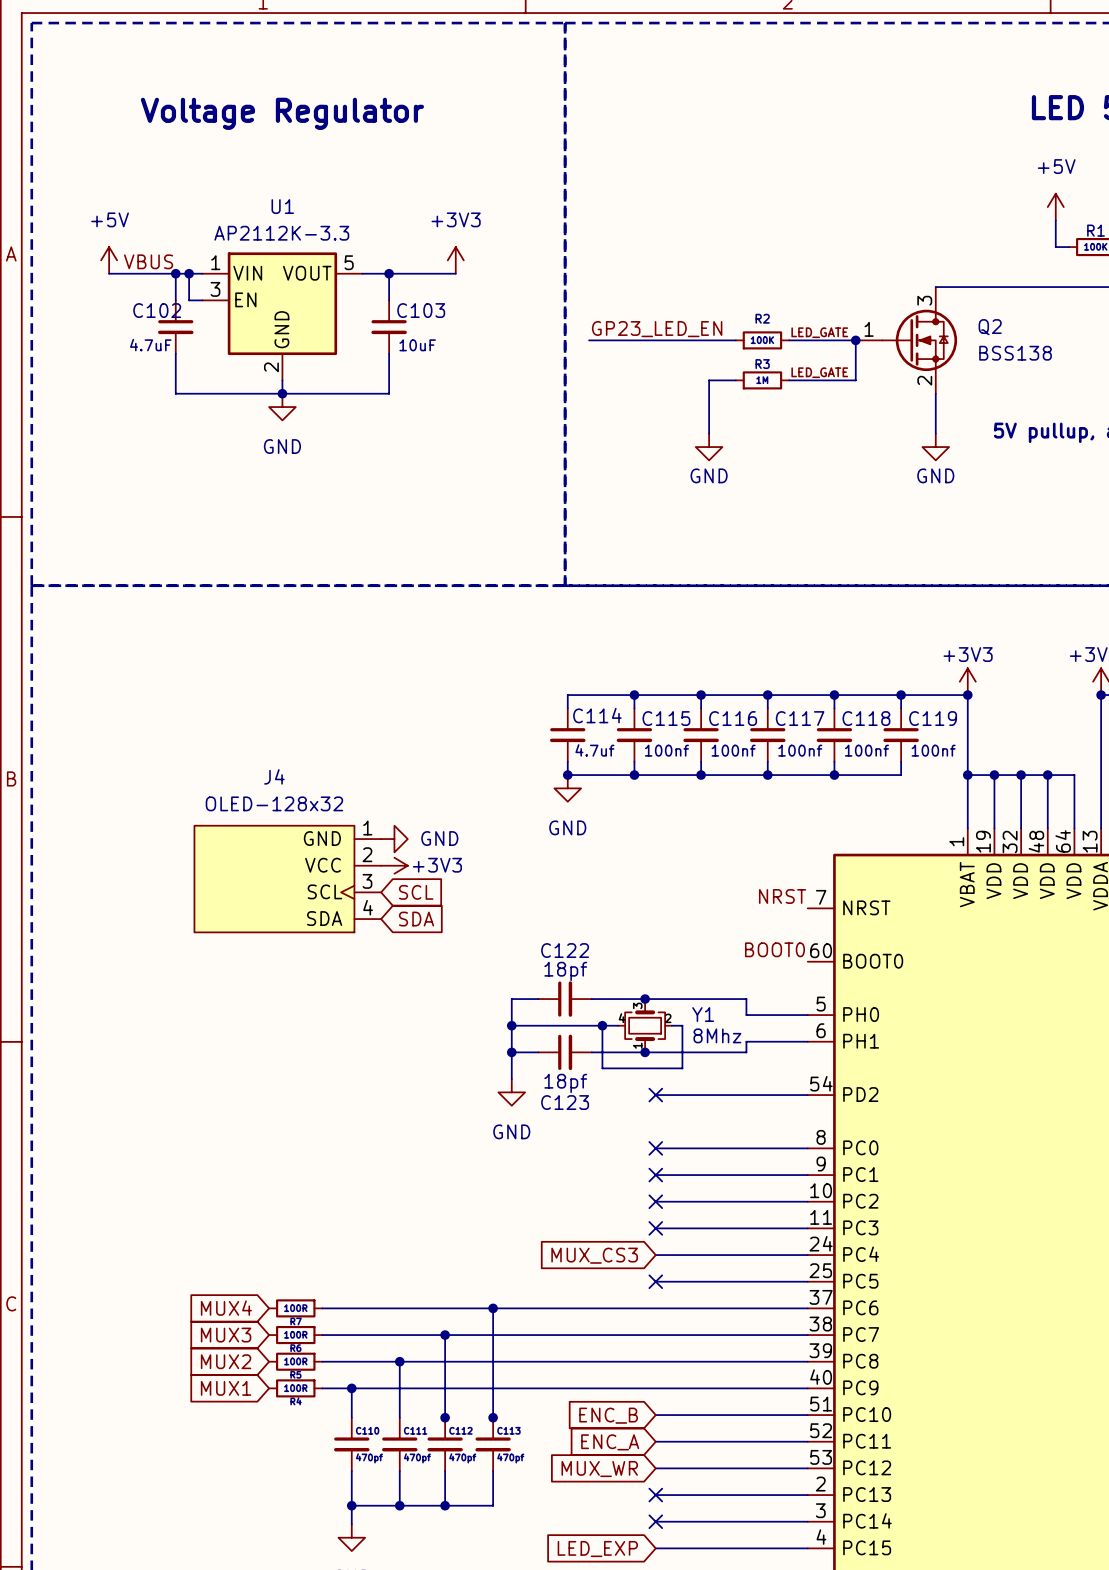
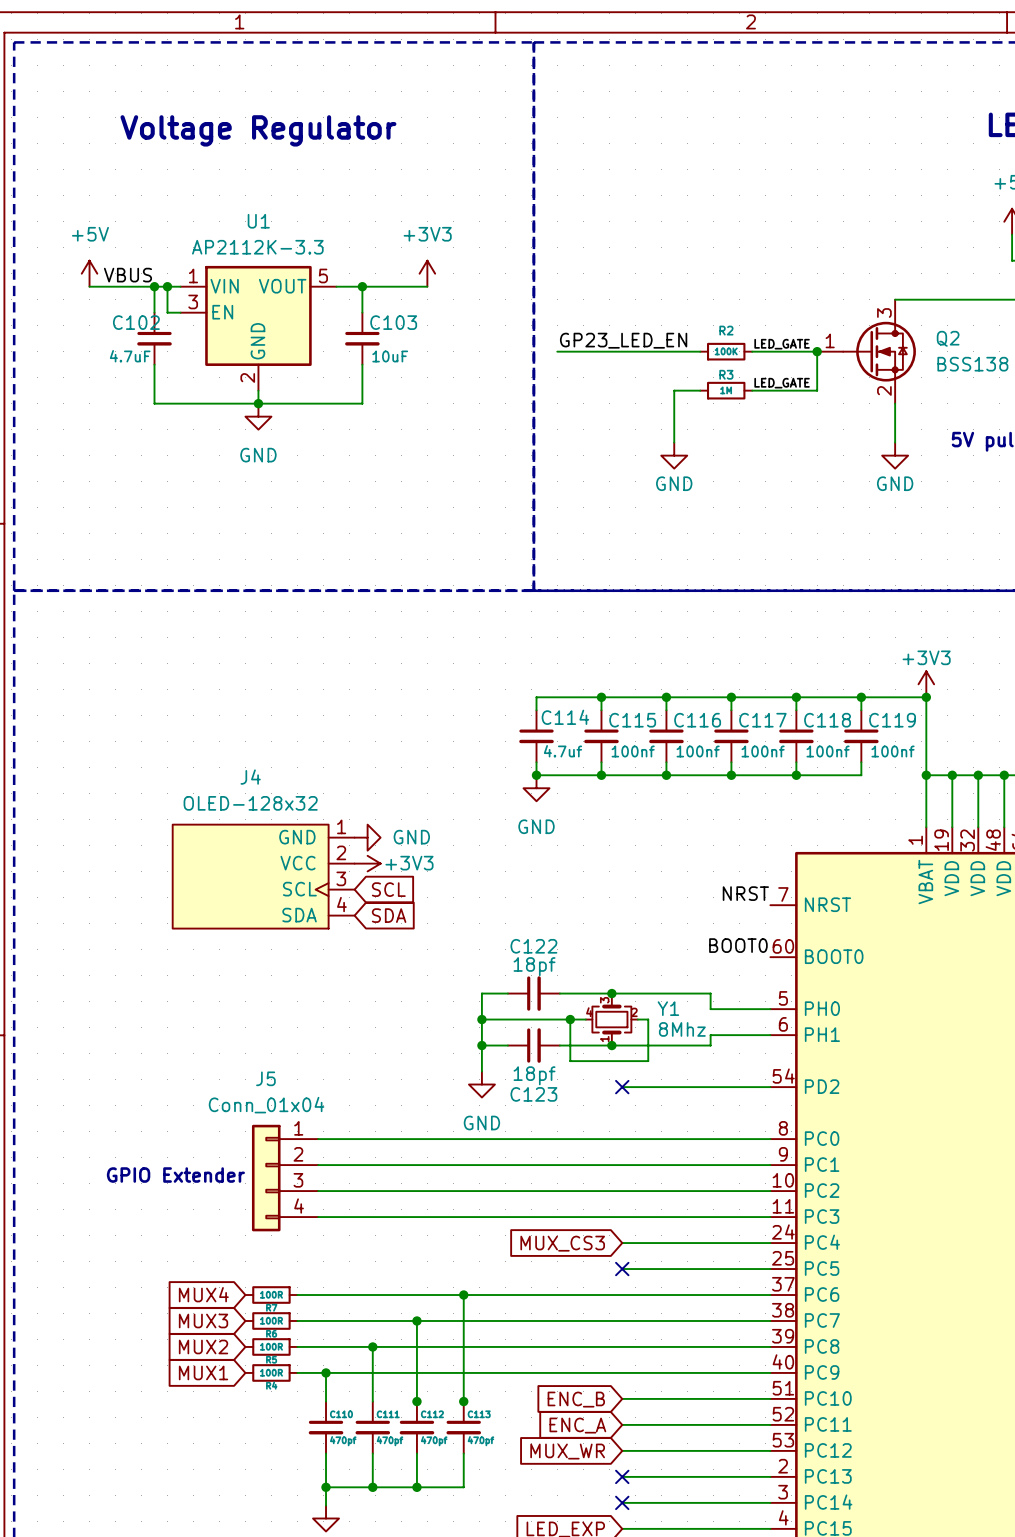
wire: none -> (318, 1139) (622, 1139)
no-connect mark: (655, 1148) -> none
wire: none -> (318, 1165) (622, 1165)
no-connect mark: (655, 1175) -> none
text: none -> GPIO Extender (175, 1175)
J5: none -> Conn_01x04 (285, 1178)
wire: none -> (318, 1191) (622, 1191)
no-connect mark: (655, 1201) -> none
wire: none -> (318, 1217) (622, 1217)
no-connect mark: (655, 1228) -> none

